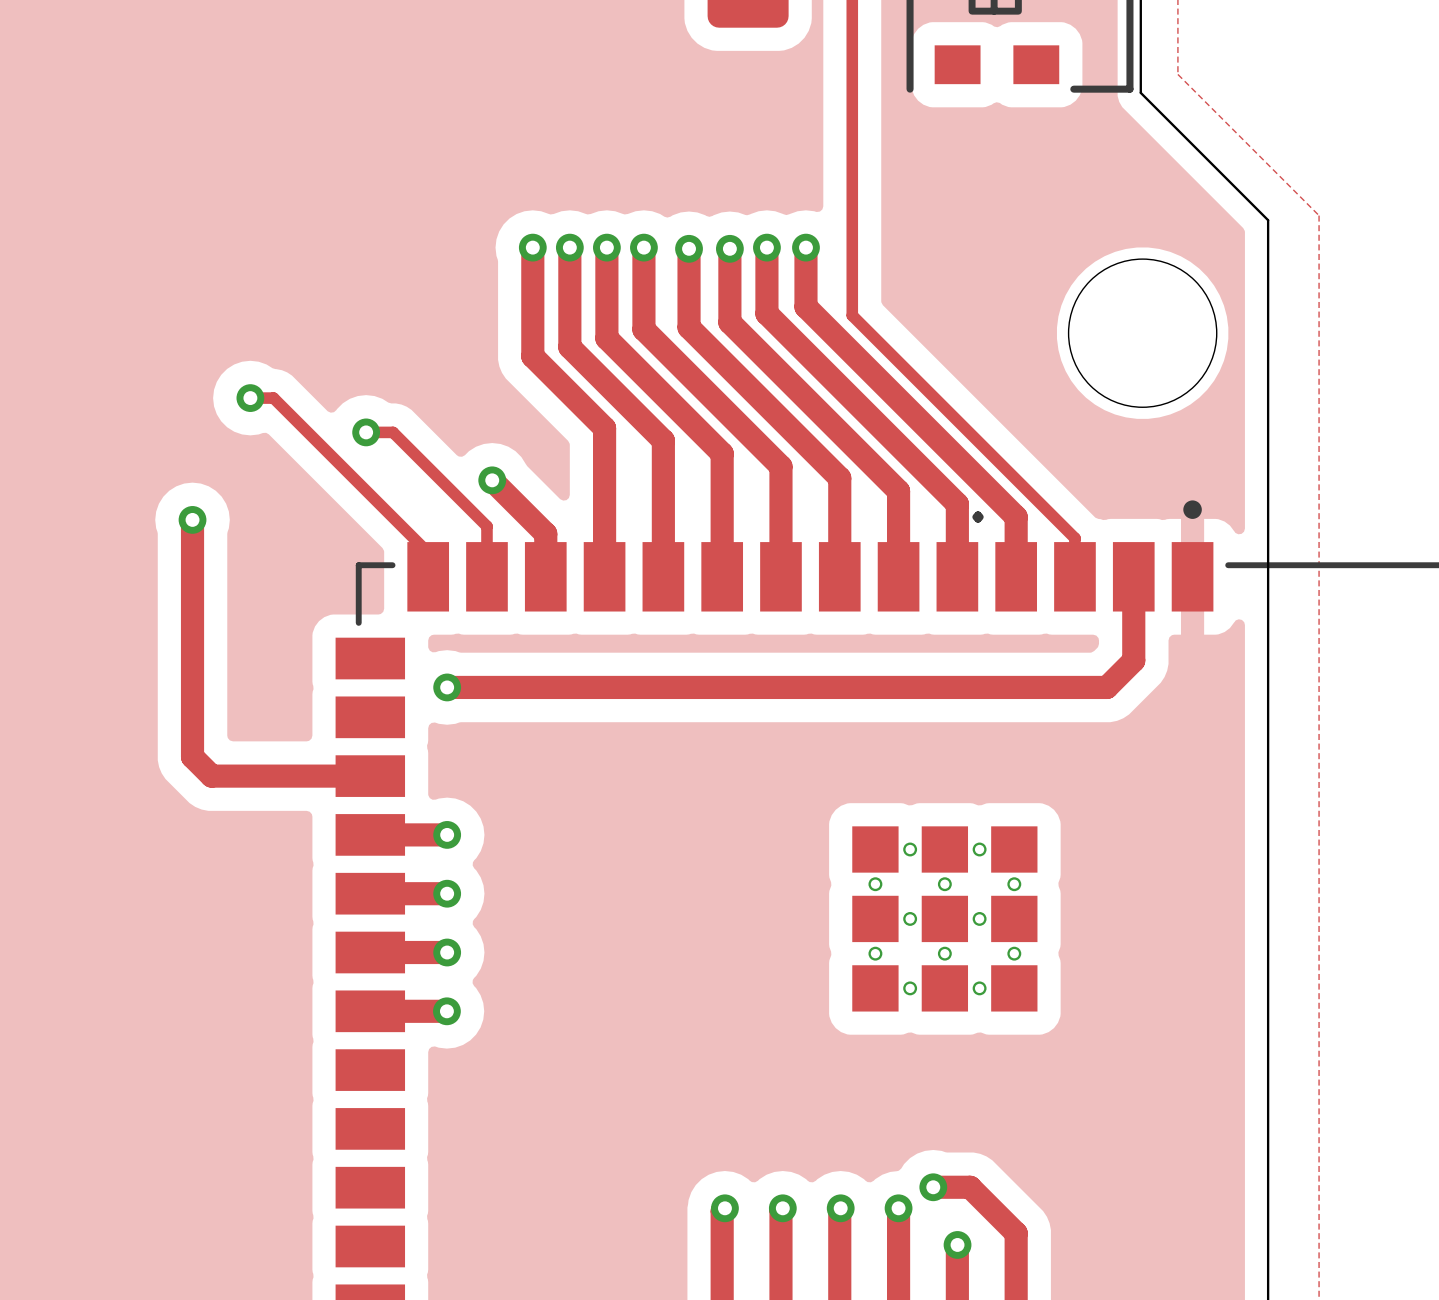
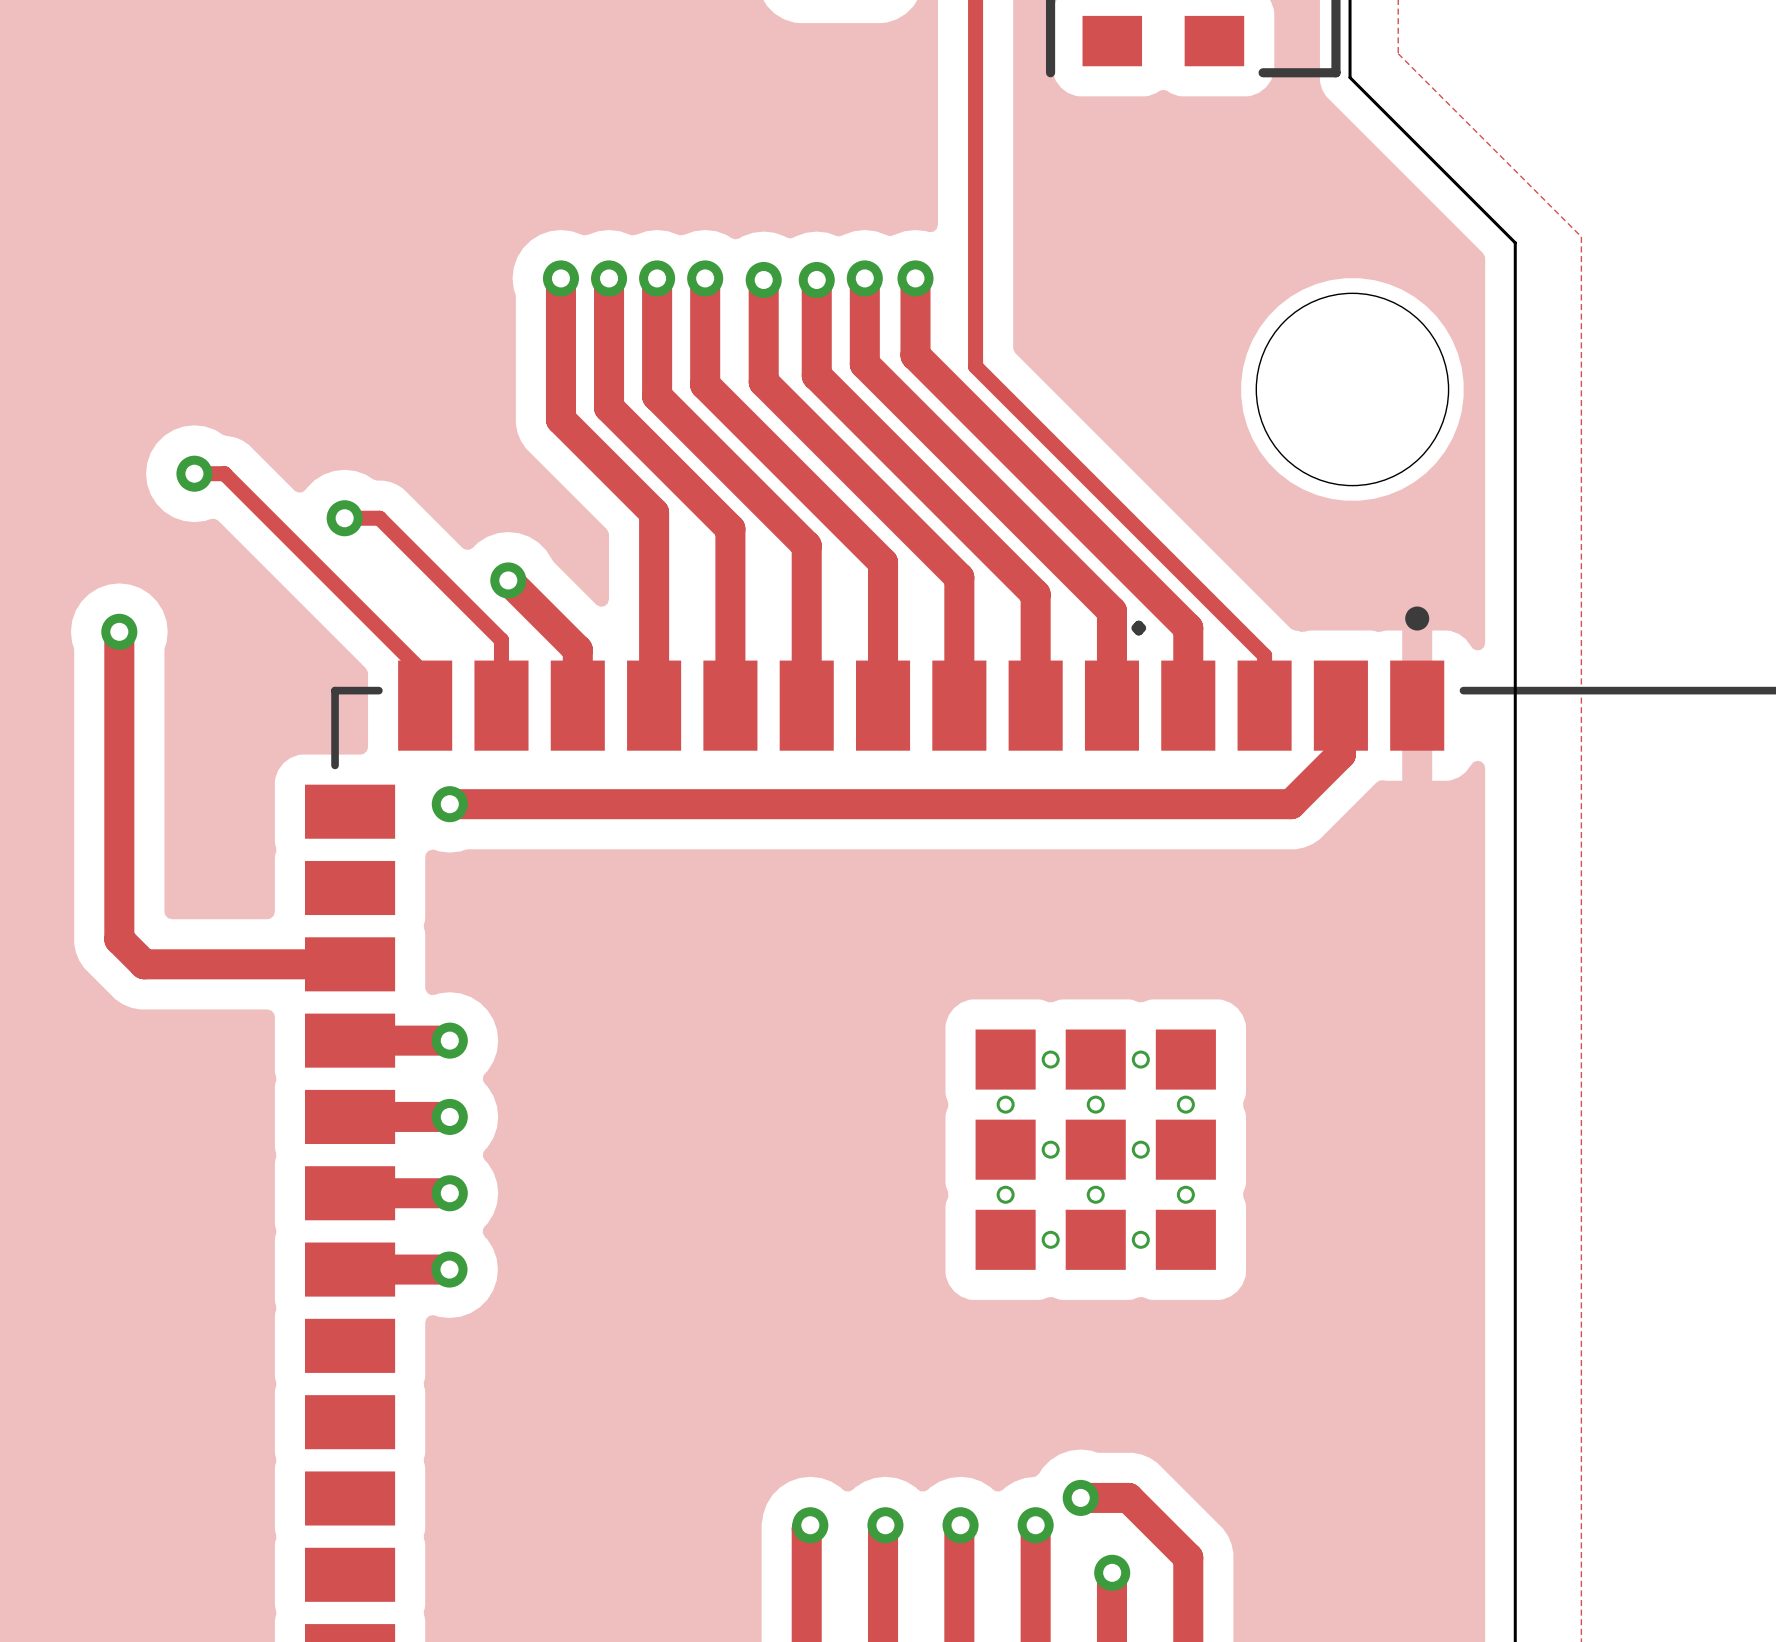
track: (1133, 614) (1133, 660) (1106, 687) (447, 687) -> (1340, 754) (1291, 804) (449, 804)
via position: (447, 687) -> (449, 804)

